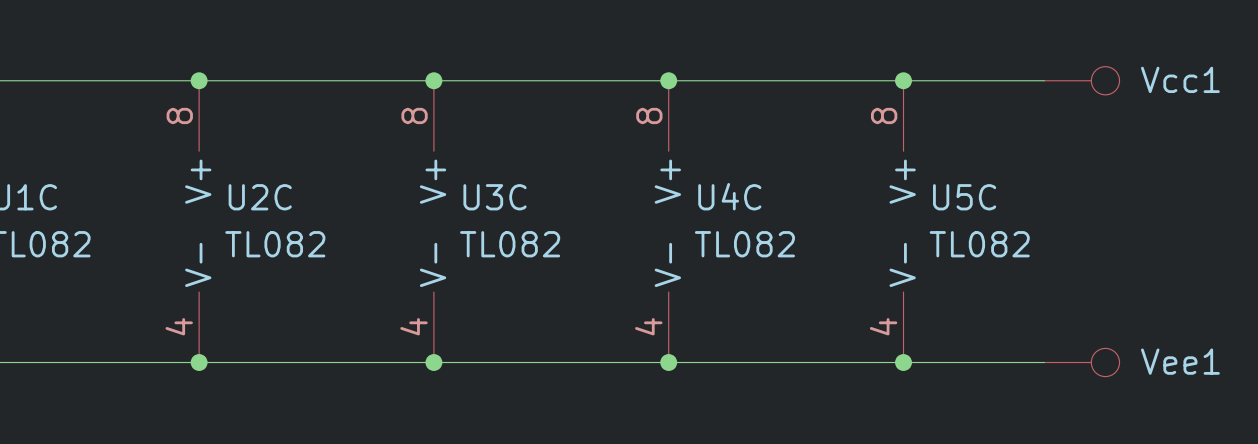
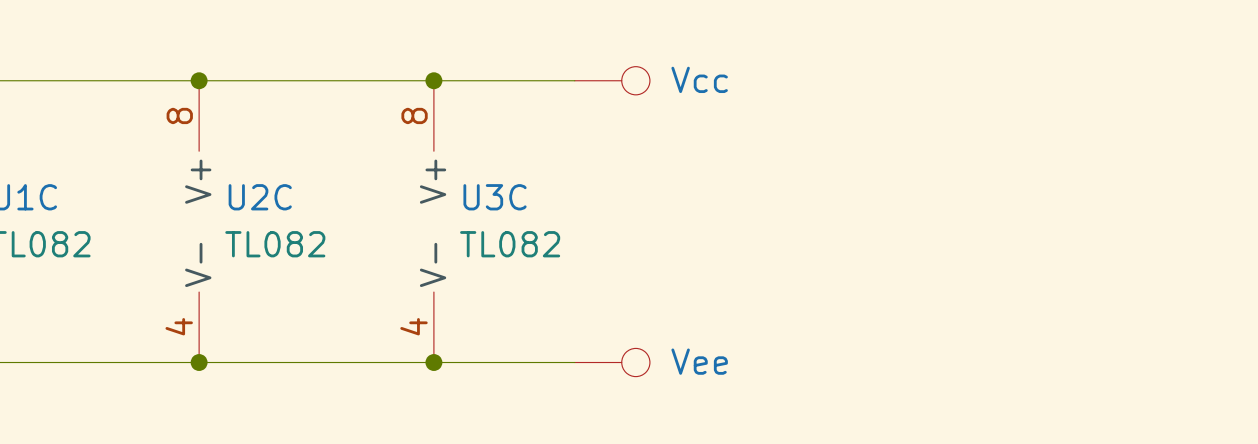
wire: (574, 80) (1044, 80) -> none
Vcc: none -> (612, 80)
junction: (668, 80) -> none
junction: (903, 80) -> none
Vcc1: (1081, 80) -> none
U4C: TL082 (668, 221) -> none
U5C: TL082 (903, 221) -> none
wire: (574, 362) (1044, 362) -> none
Vee: none -> (612, 362)
junction: (668, 362) -> none
junction: (903, 362) -> none
Vee1: (1081, 362) -> none

